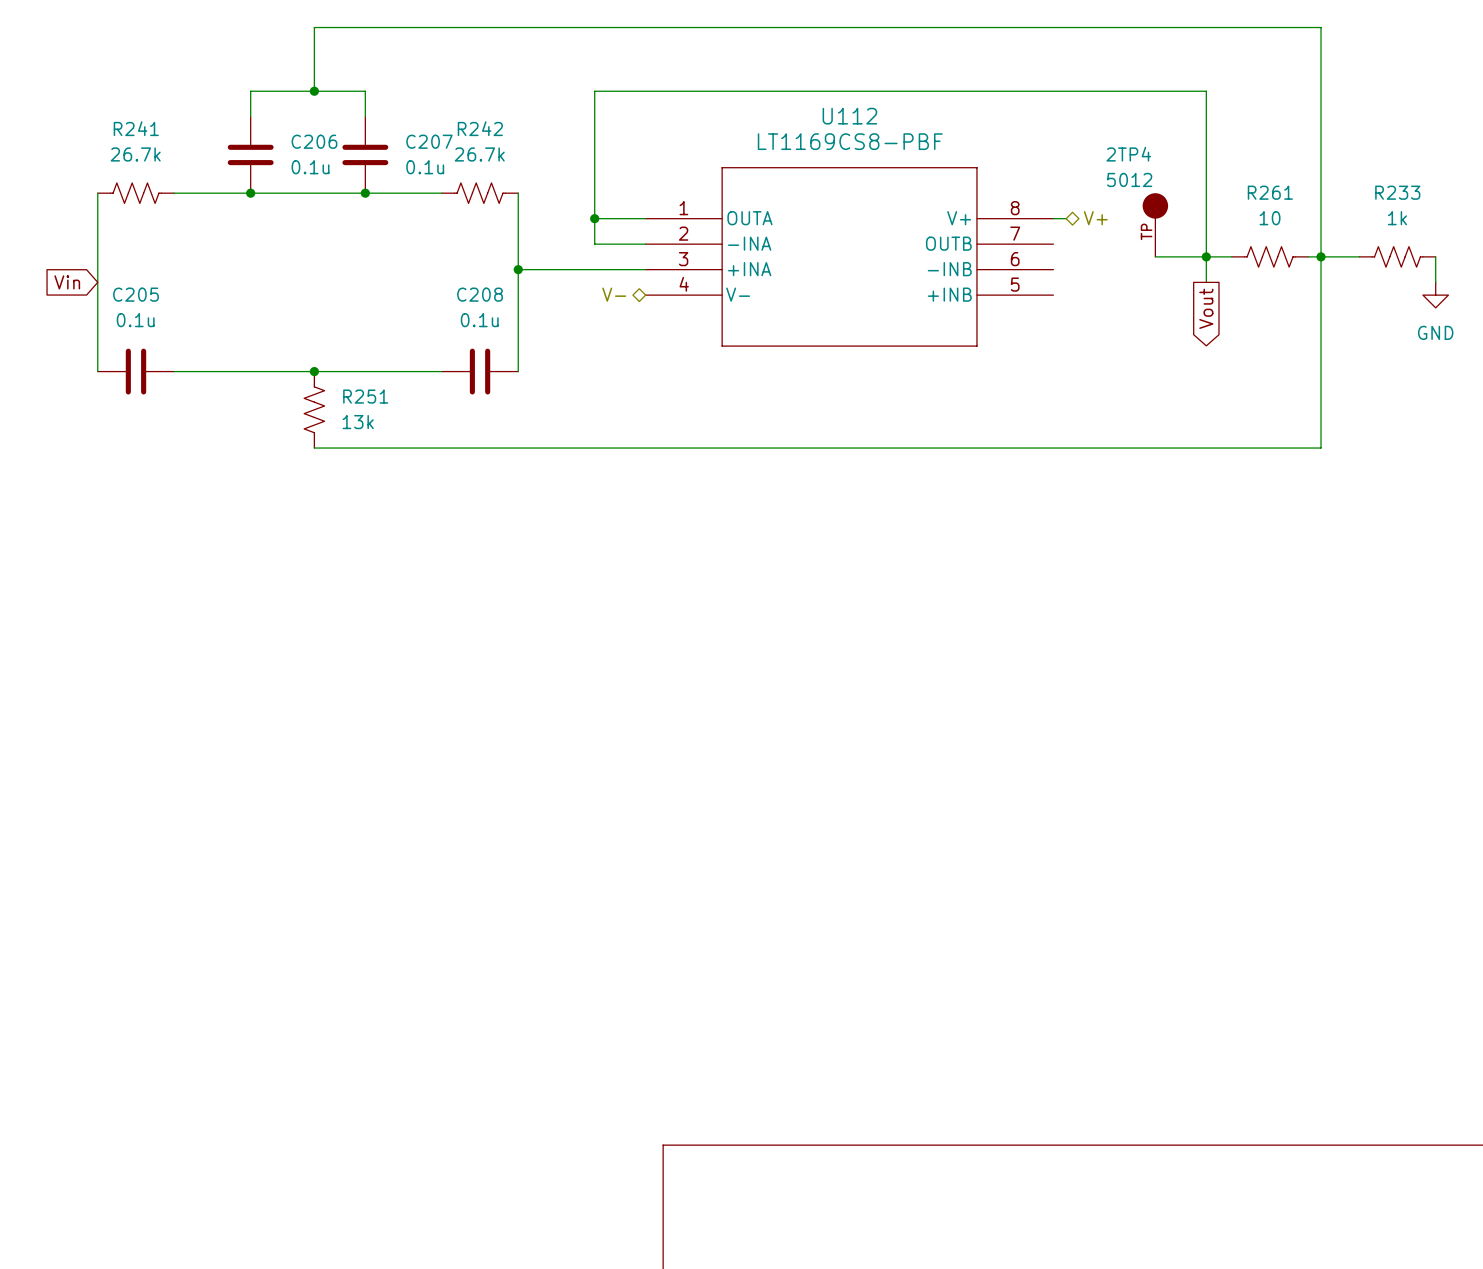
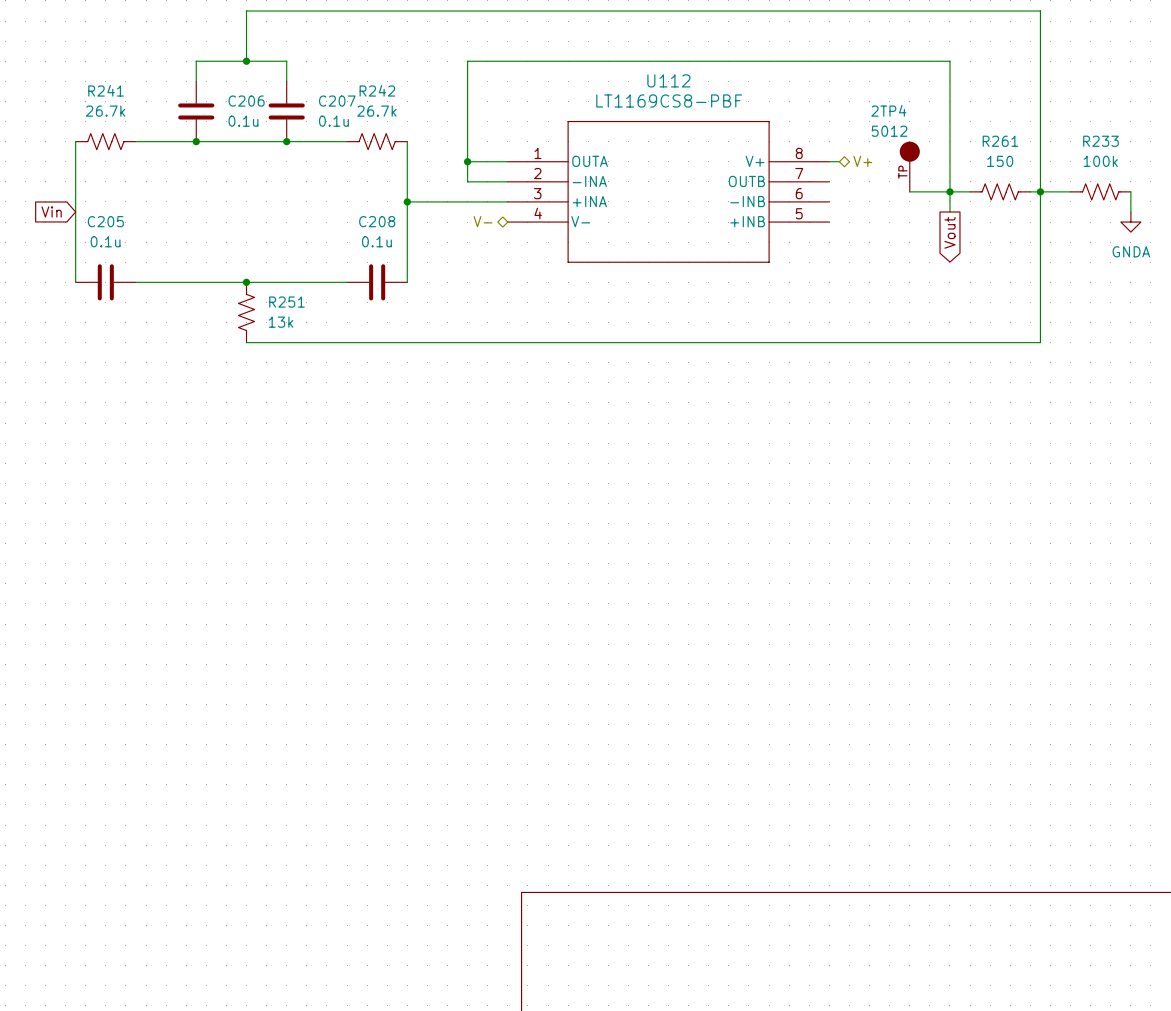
R261 value: 10 (1270, 218) -> 150 (1000, 161)
R233 value: 1k (1397, 218) -> 100k (1100, 161)
power symbol: GND (1435, 295) -> GNDA (1130, 222)

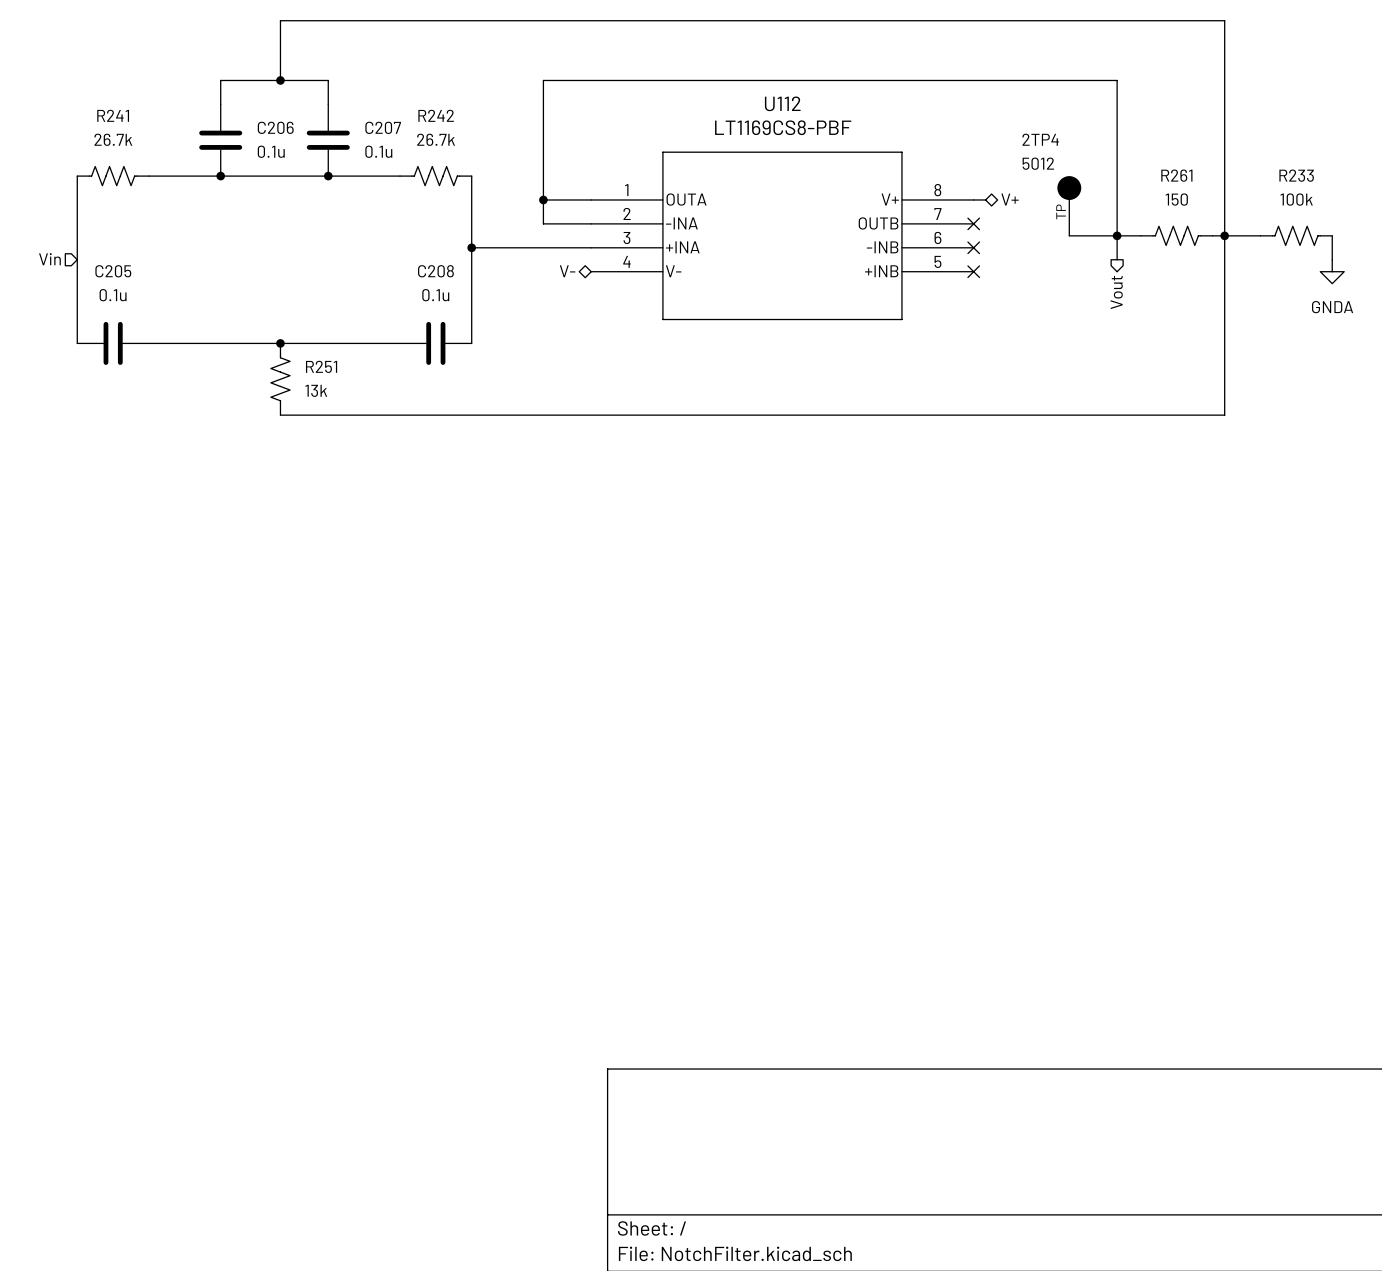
no-connect mark: none -> (973, 223)
no-connect mark: none -> (973, 247)
hierarchical label: none -> Vin (49, 259)
global label: Vin (51, 211) -> none
no-connect mark: none -> (973, 271)
global label: Vout (949, 232) -> none
hierarchical label: none -> Vout (1116, 292)

